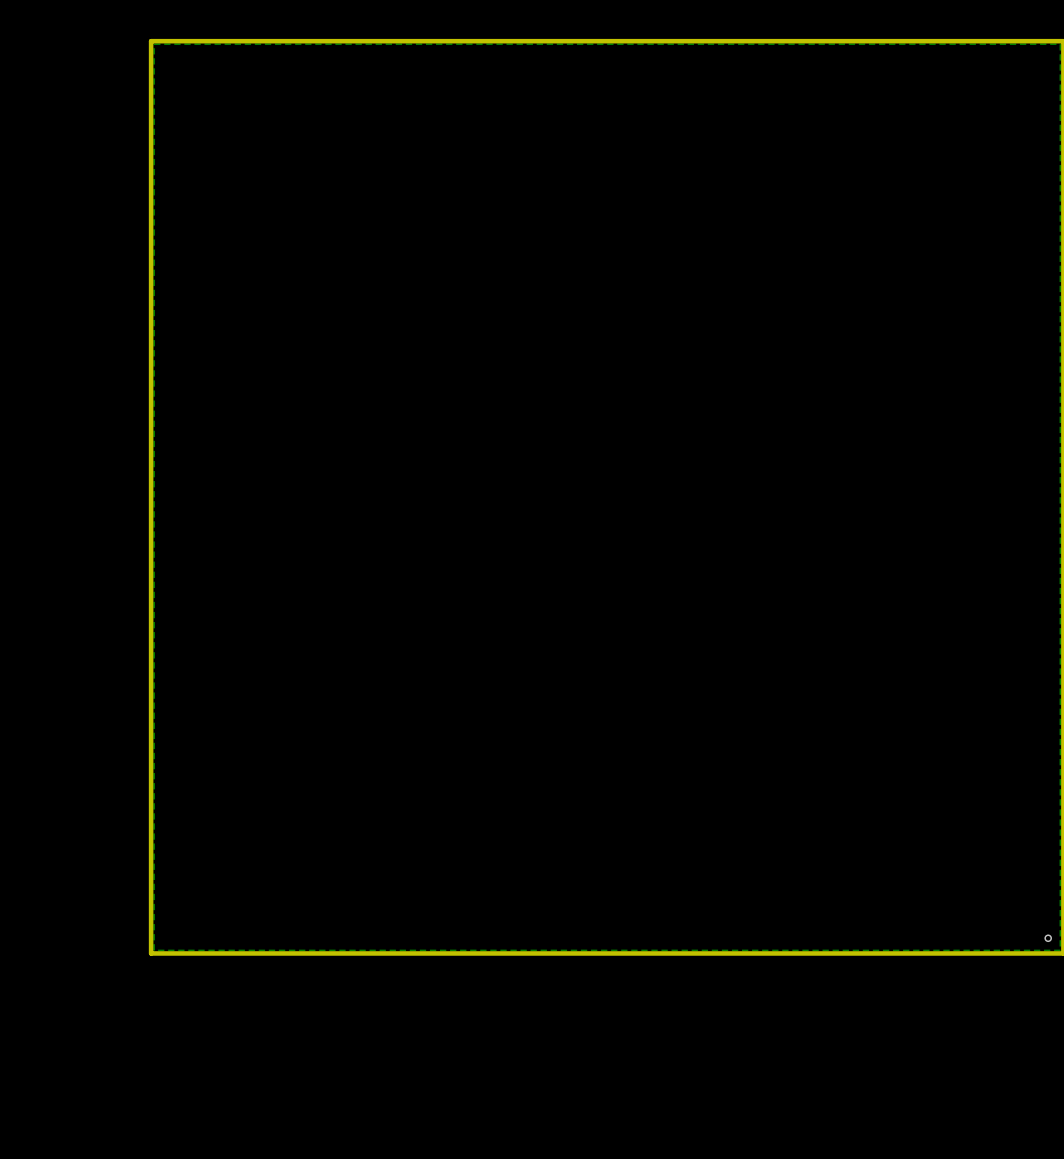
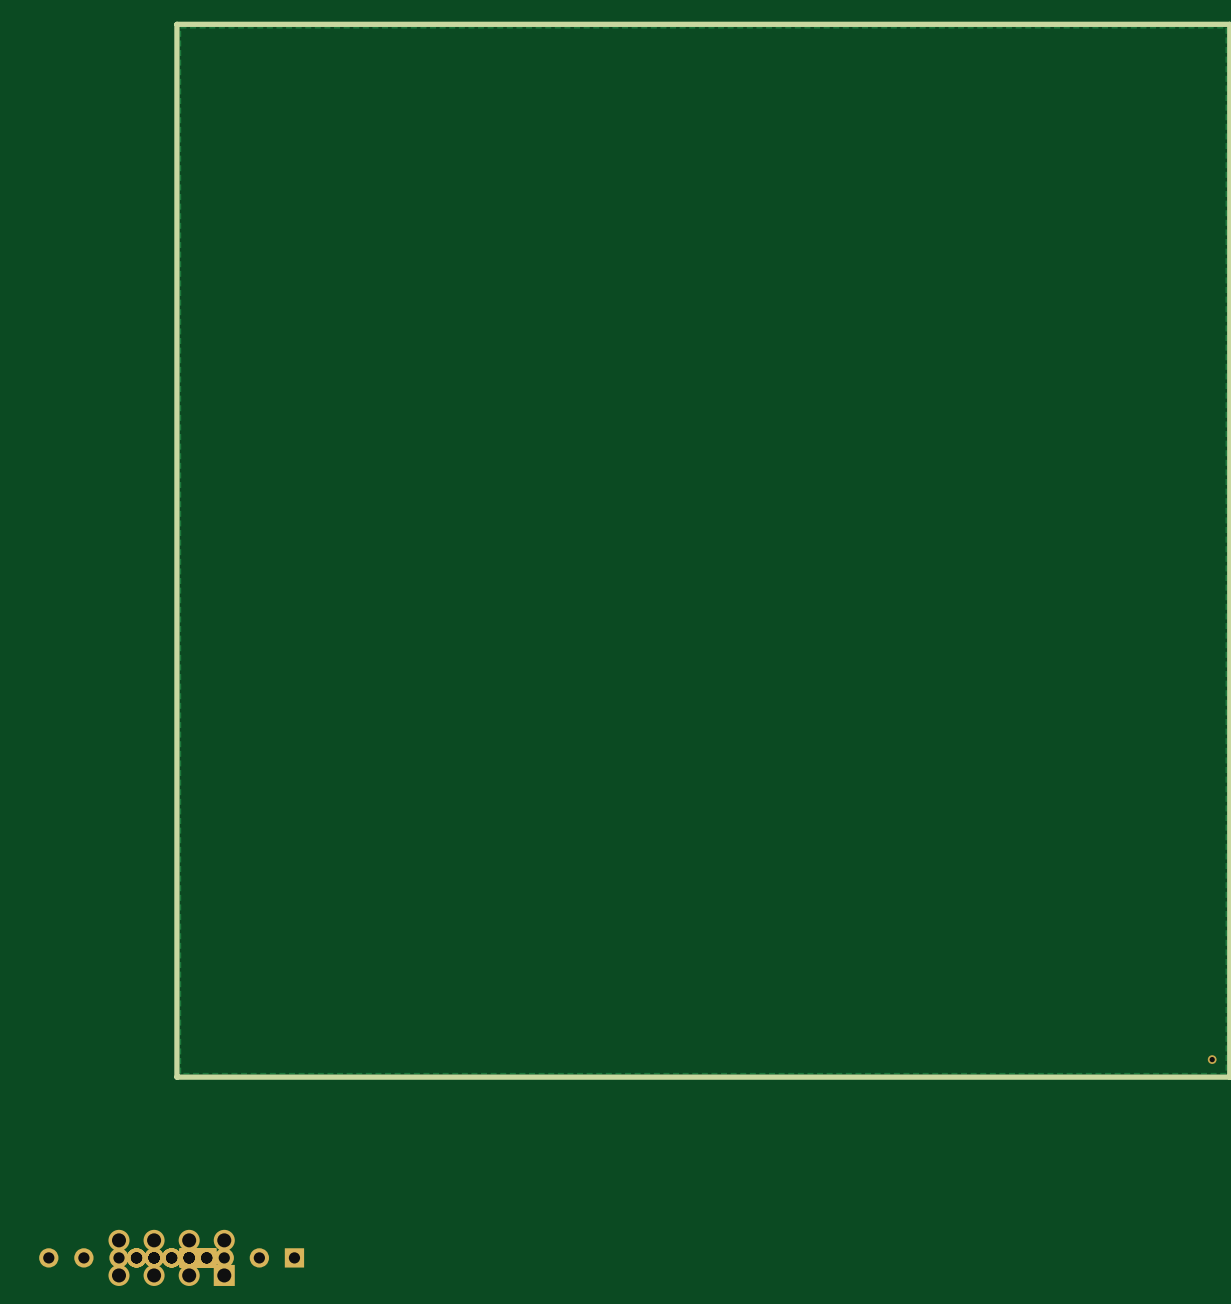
part: none -> (171, 1257)
part: none -> (171, 1257)
part: none -> (171, 1257)
part: none -> (171, 1257)

